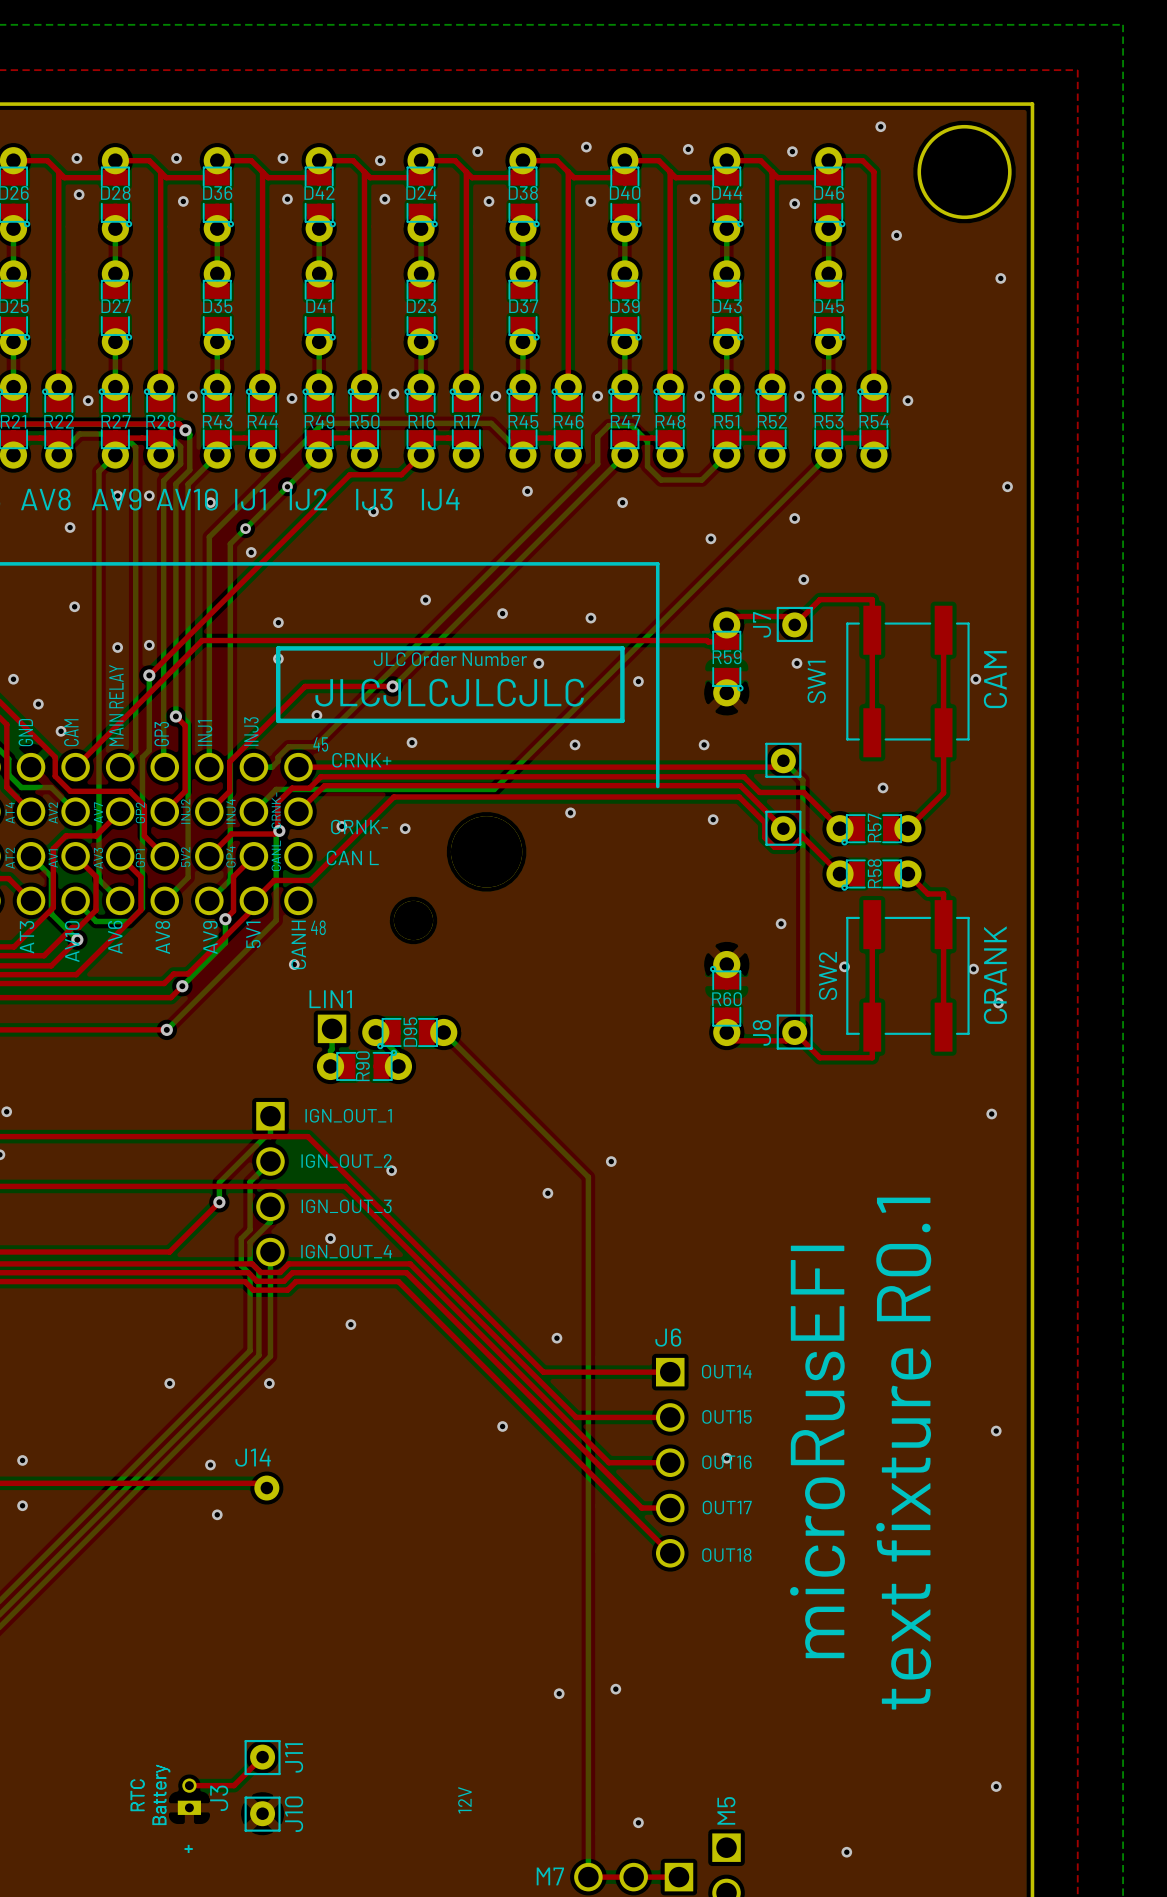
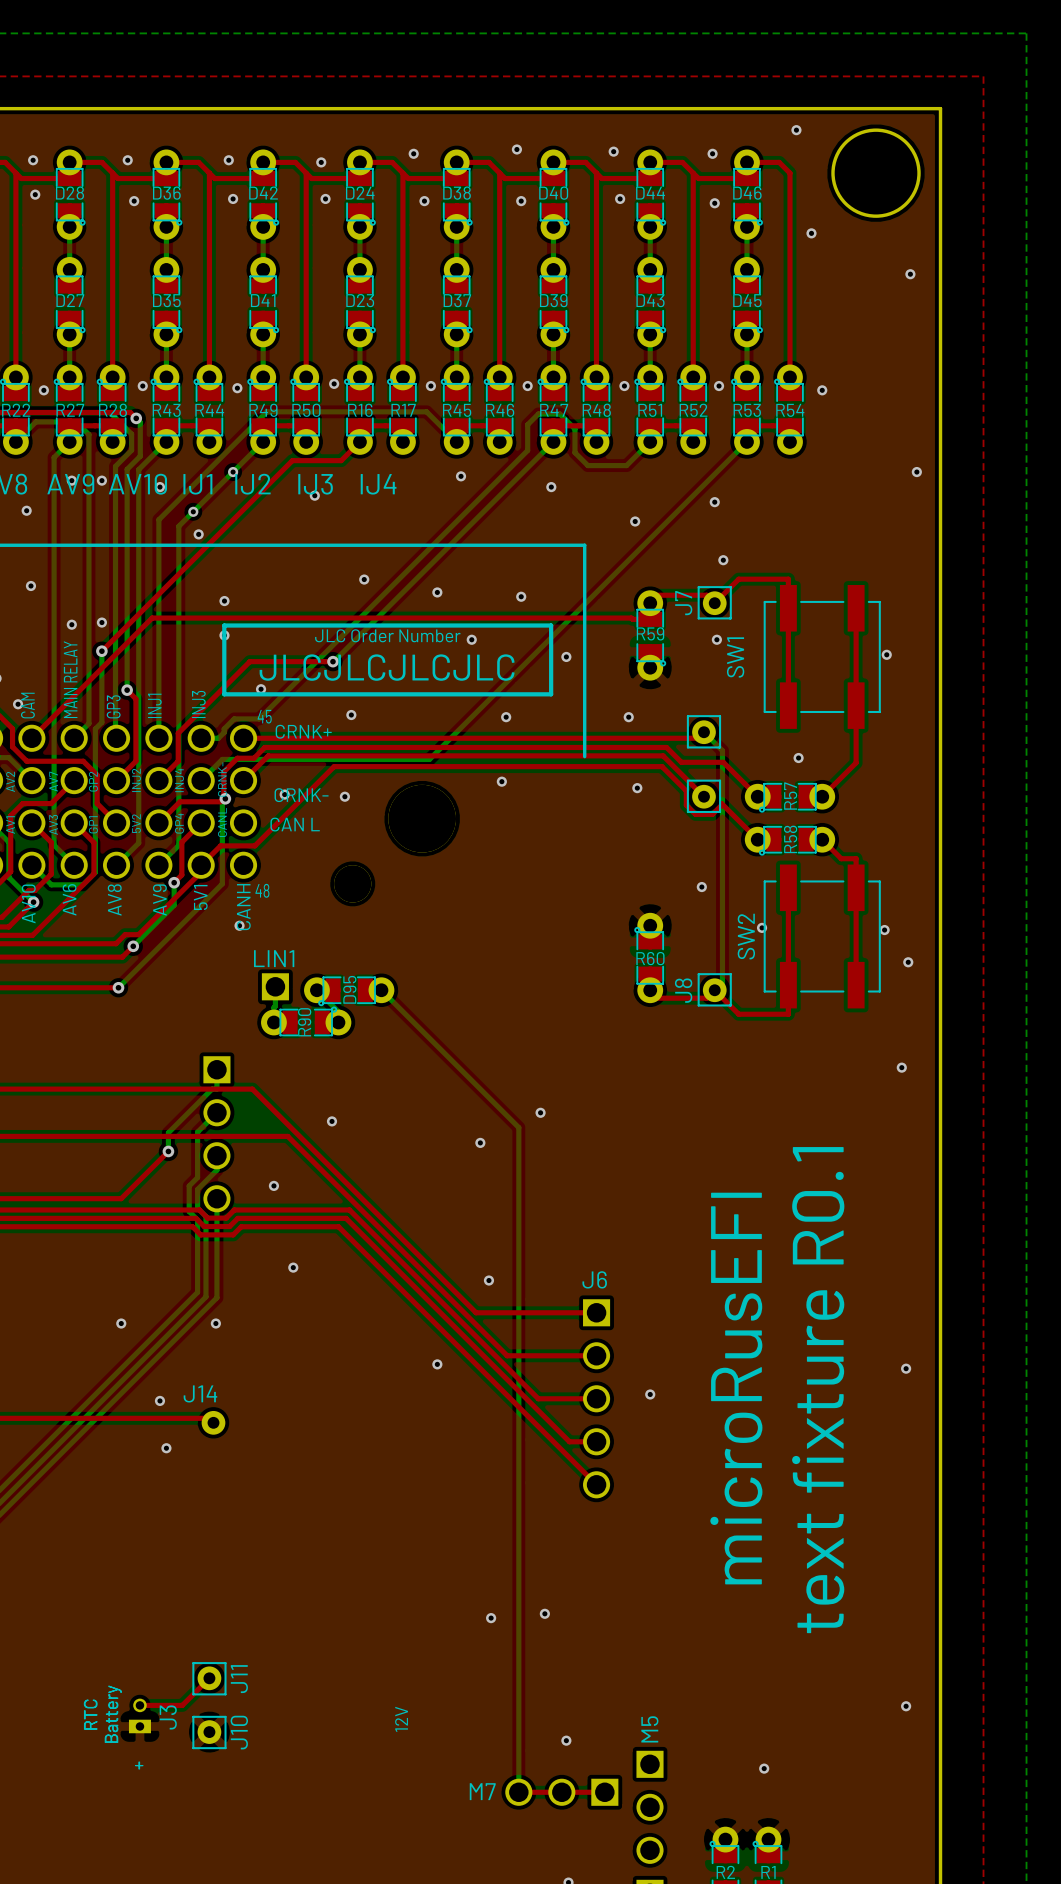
text: CAM (995, 679) -> none
text: CRANK (995, 975) -> none
text: IGN_OUT_1 (348, 1115) -> none
text: IGN_OUT_2 (346, 1161) -> none
text: IGN_OUT_3 (346, 1206) -> none
text: IGN_OUT_4 (346, 1251) -> none
text: OUT14 (726, 1371) -> none
text: OUT15 (726, 1416) -> none
text: OUT16 (726, 1462) -> none
text: OUT17 (727, 1507) -> none
text: OUT18 (726, 1555) -> none

